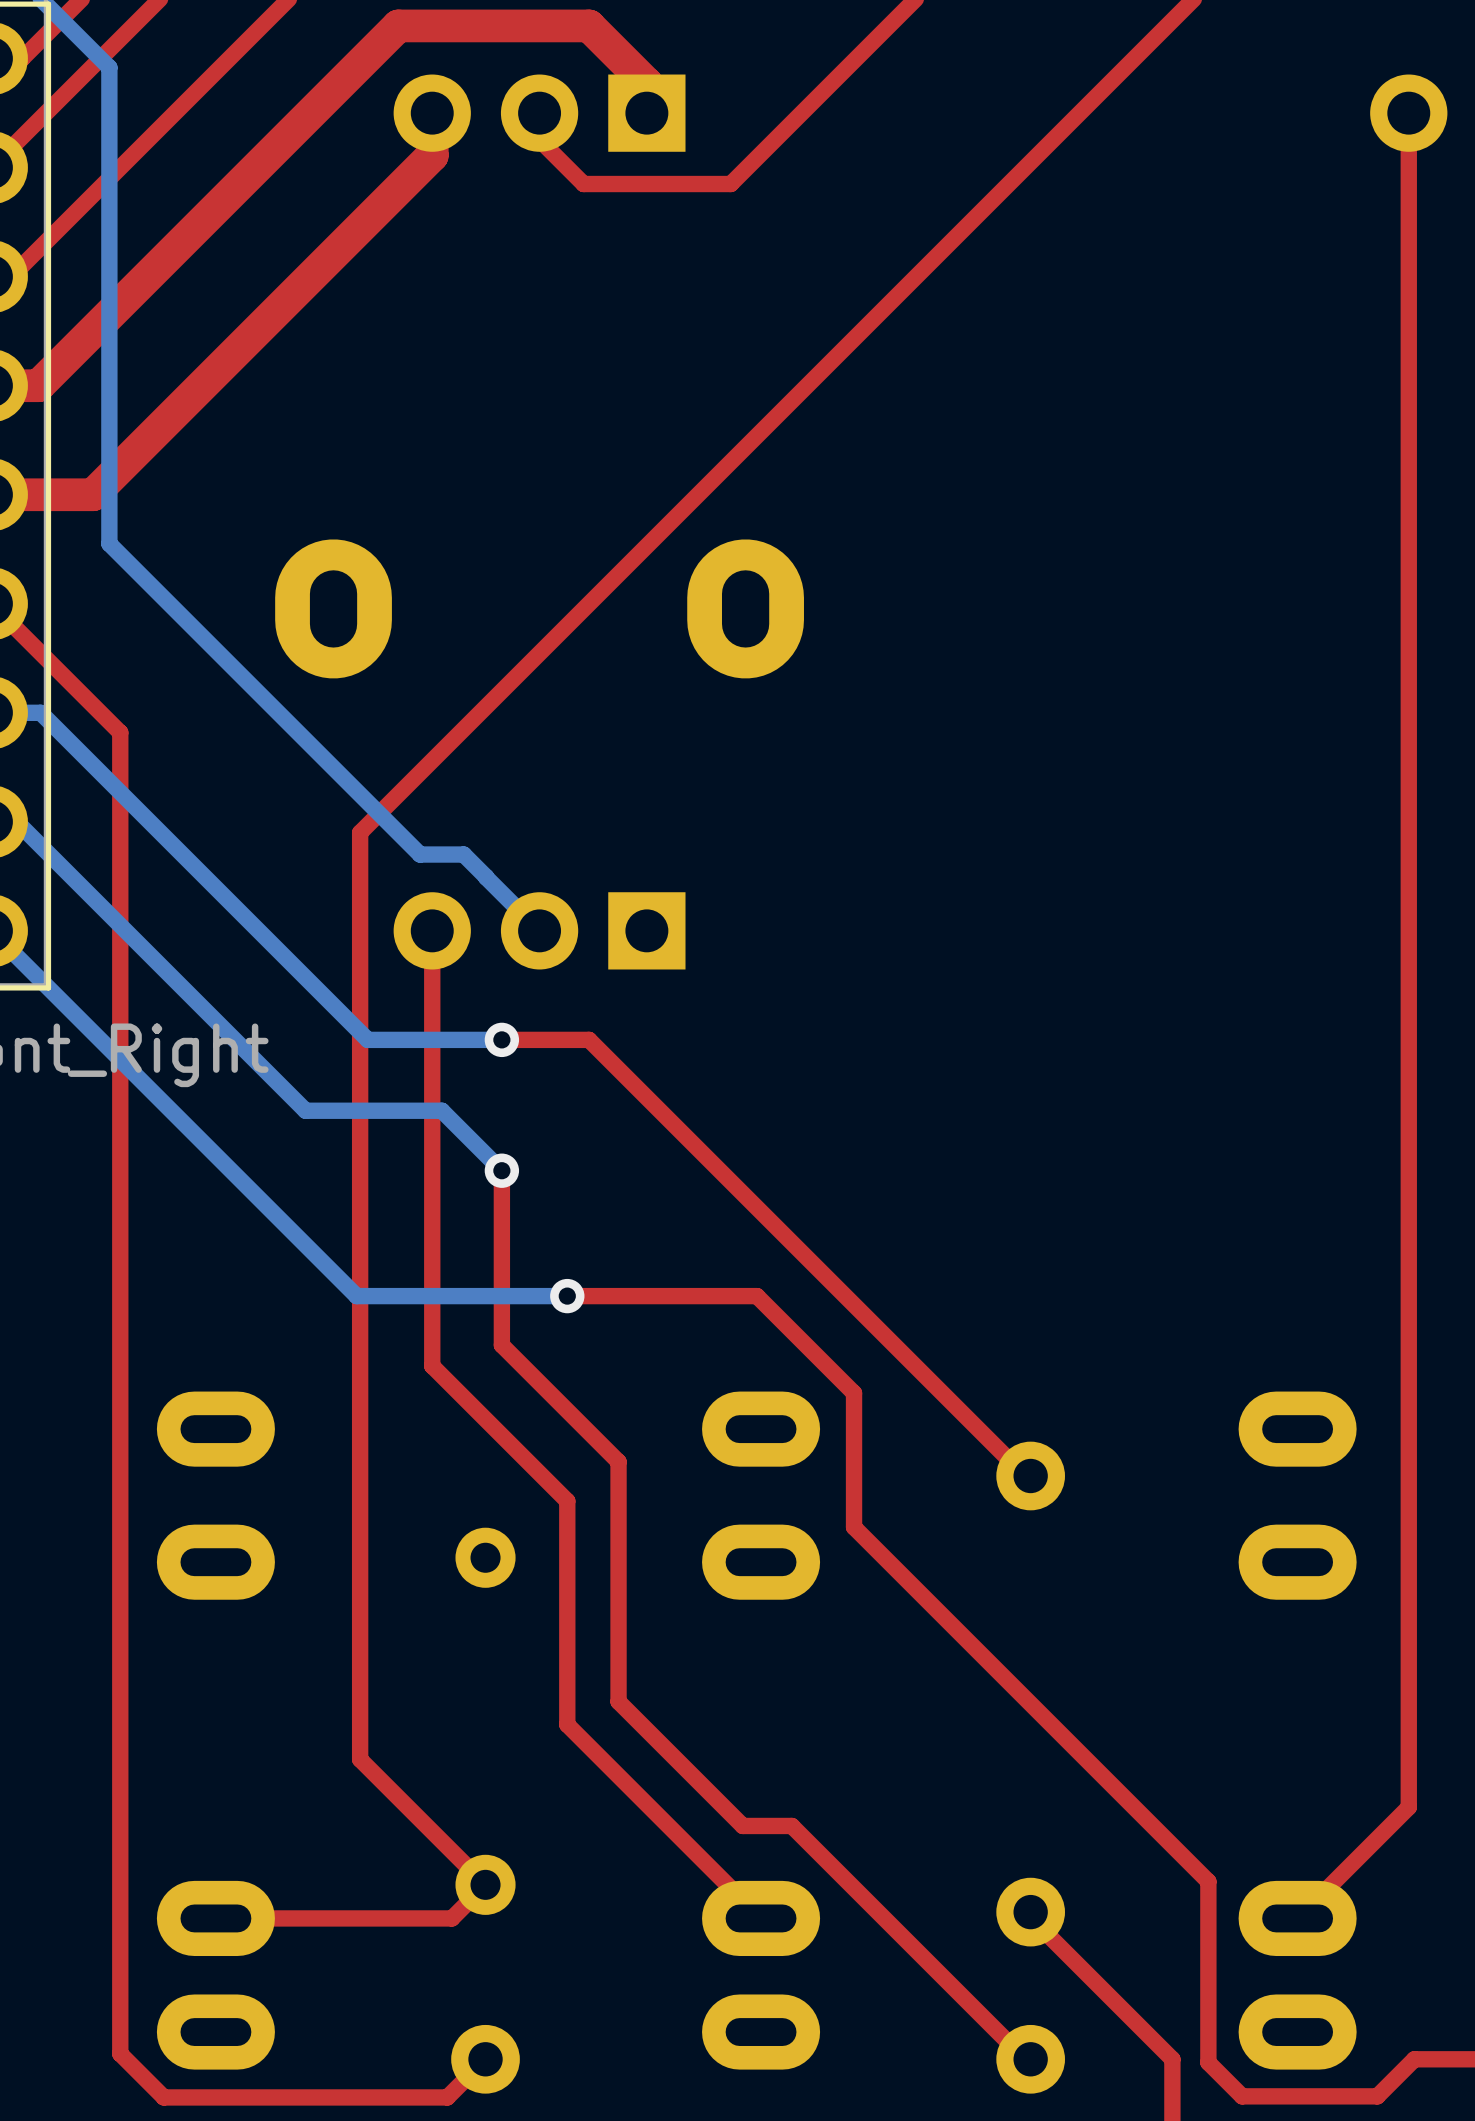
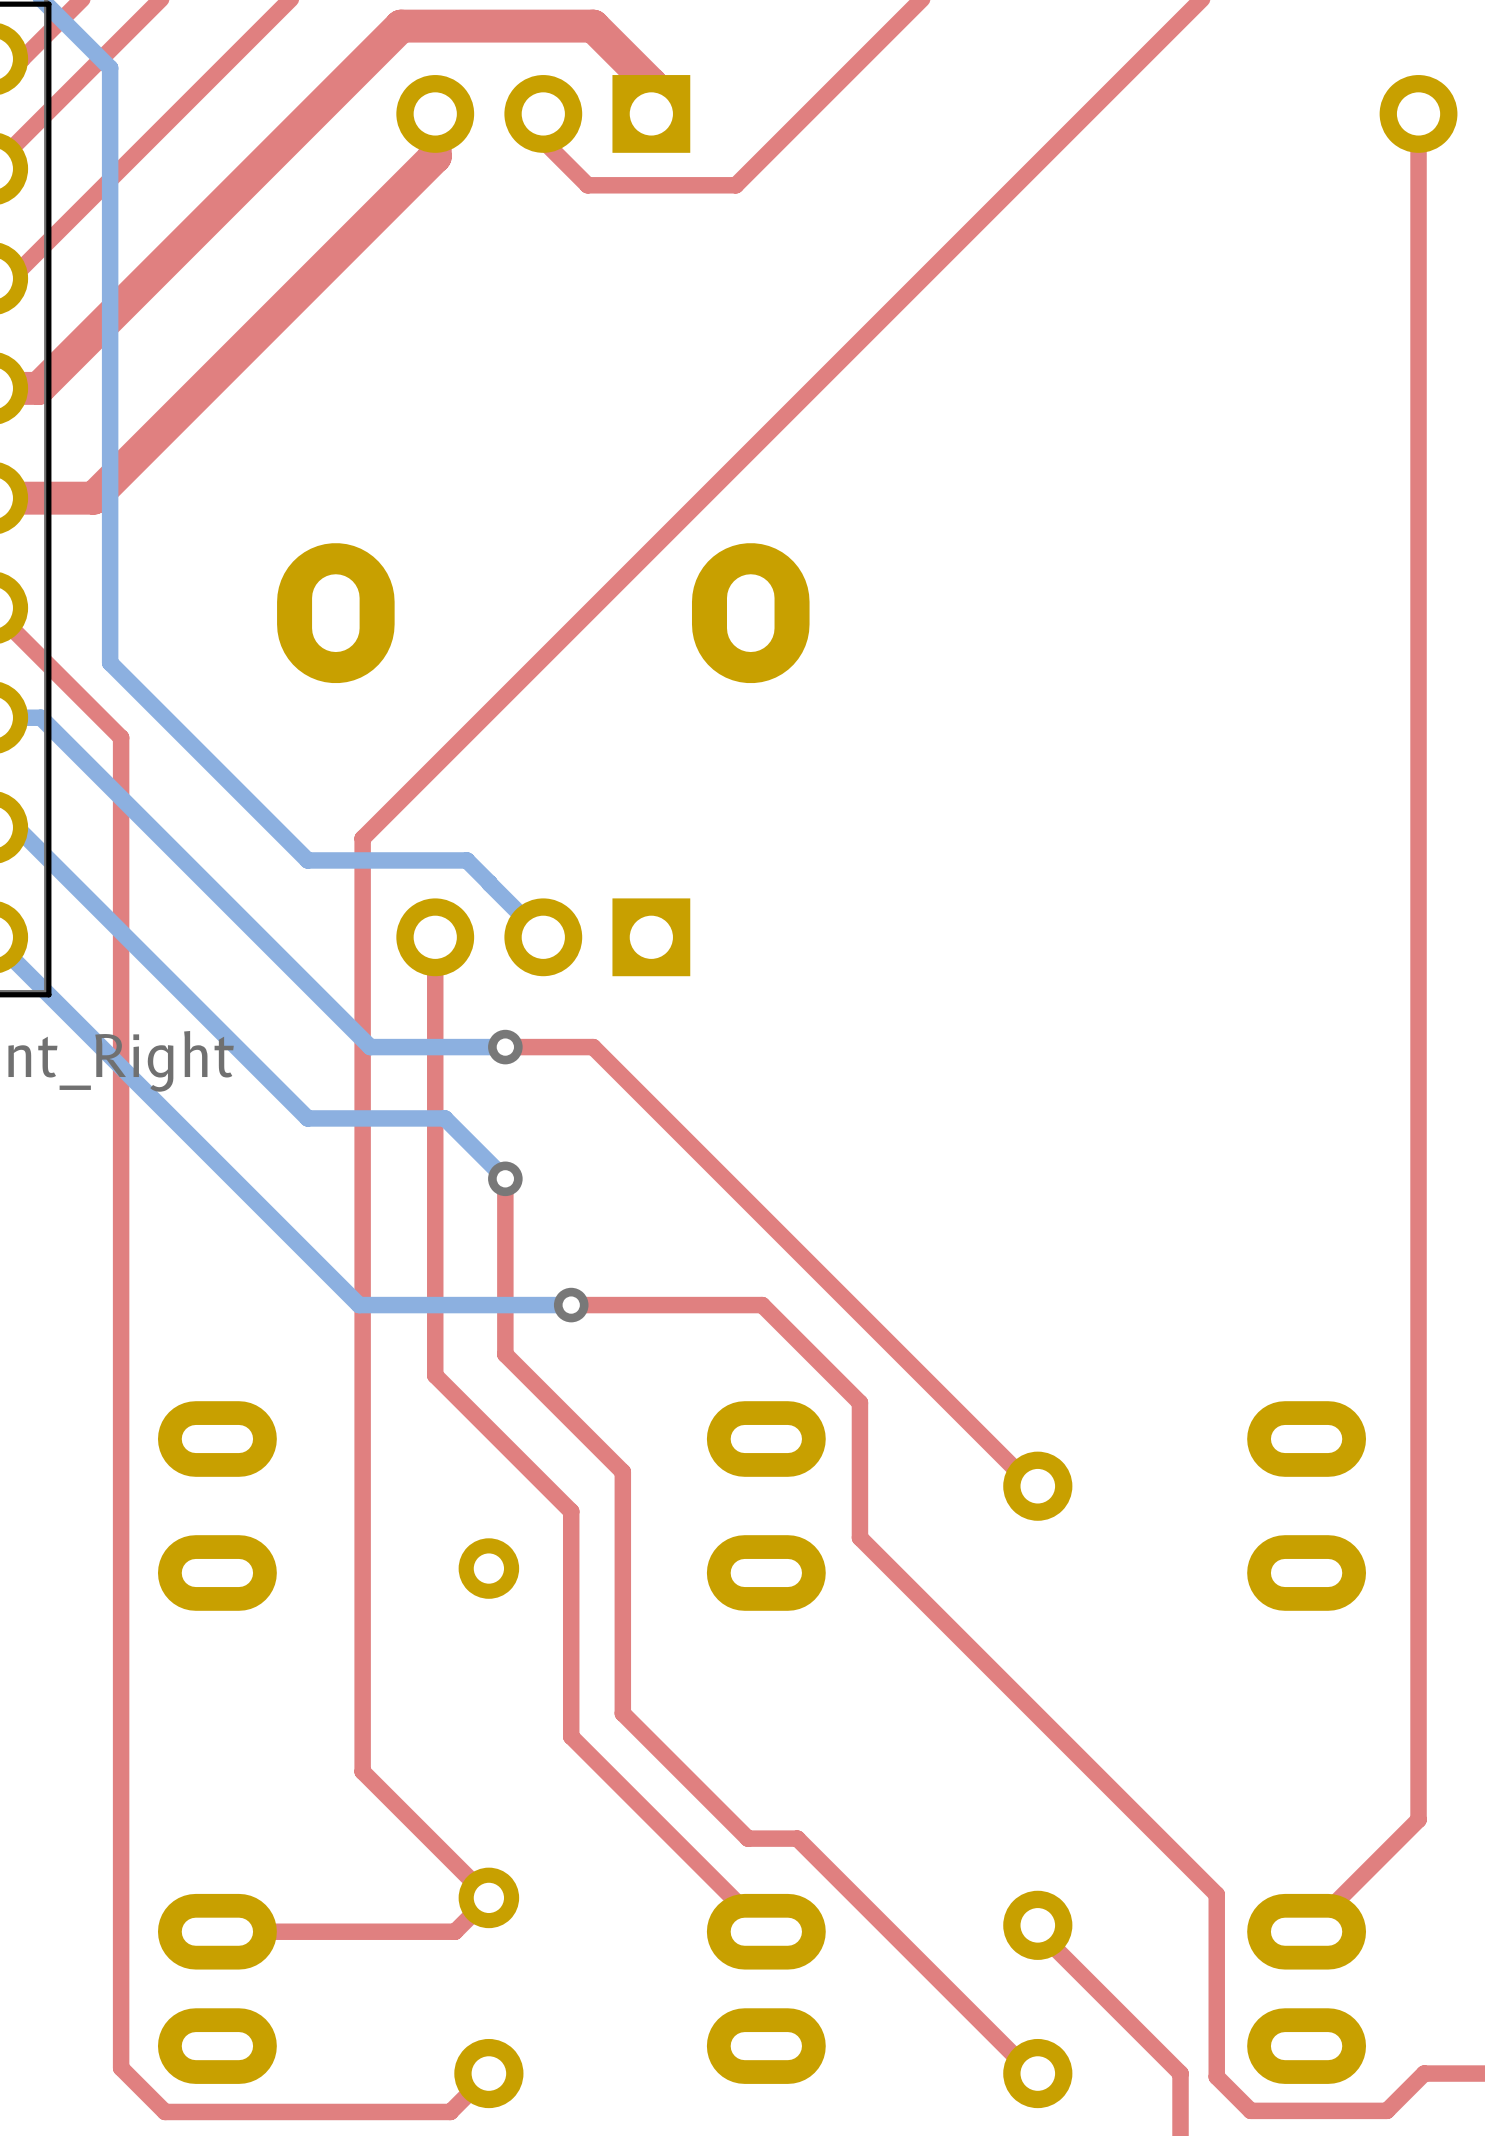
bottom track: (109, 543) (420, 854) -> (110, 547) (110, 662) (307, 860) (423, 860)

